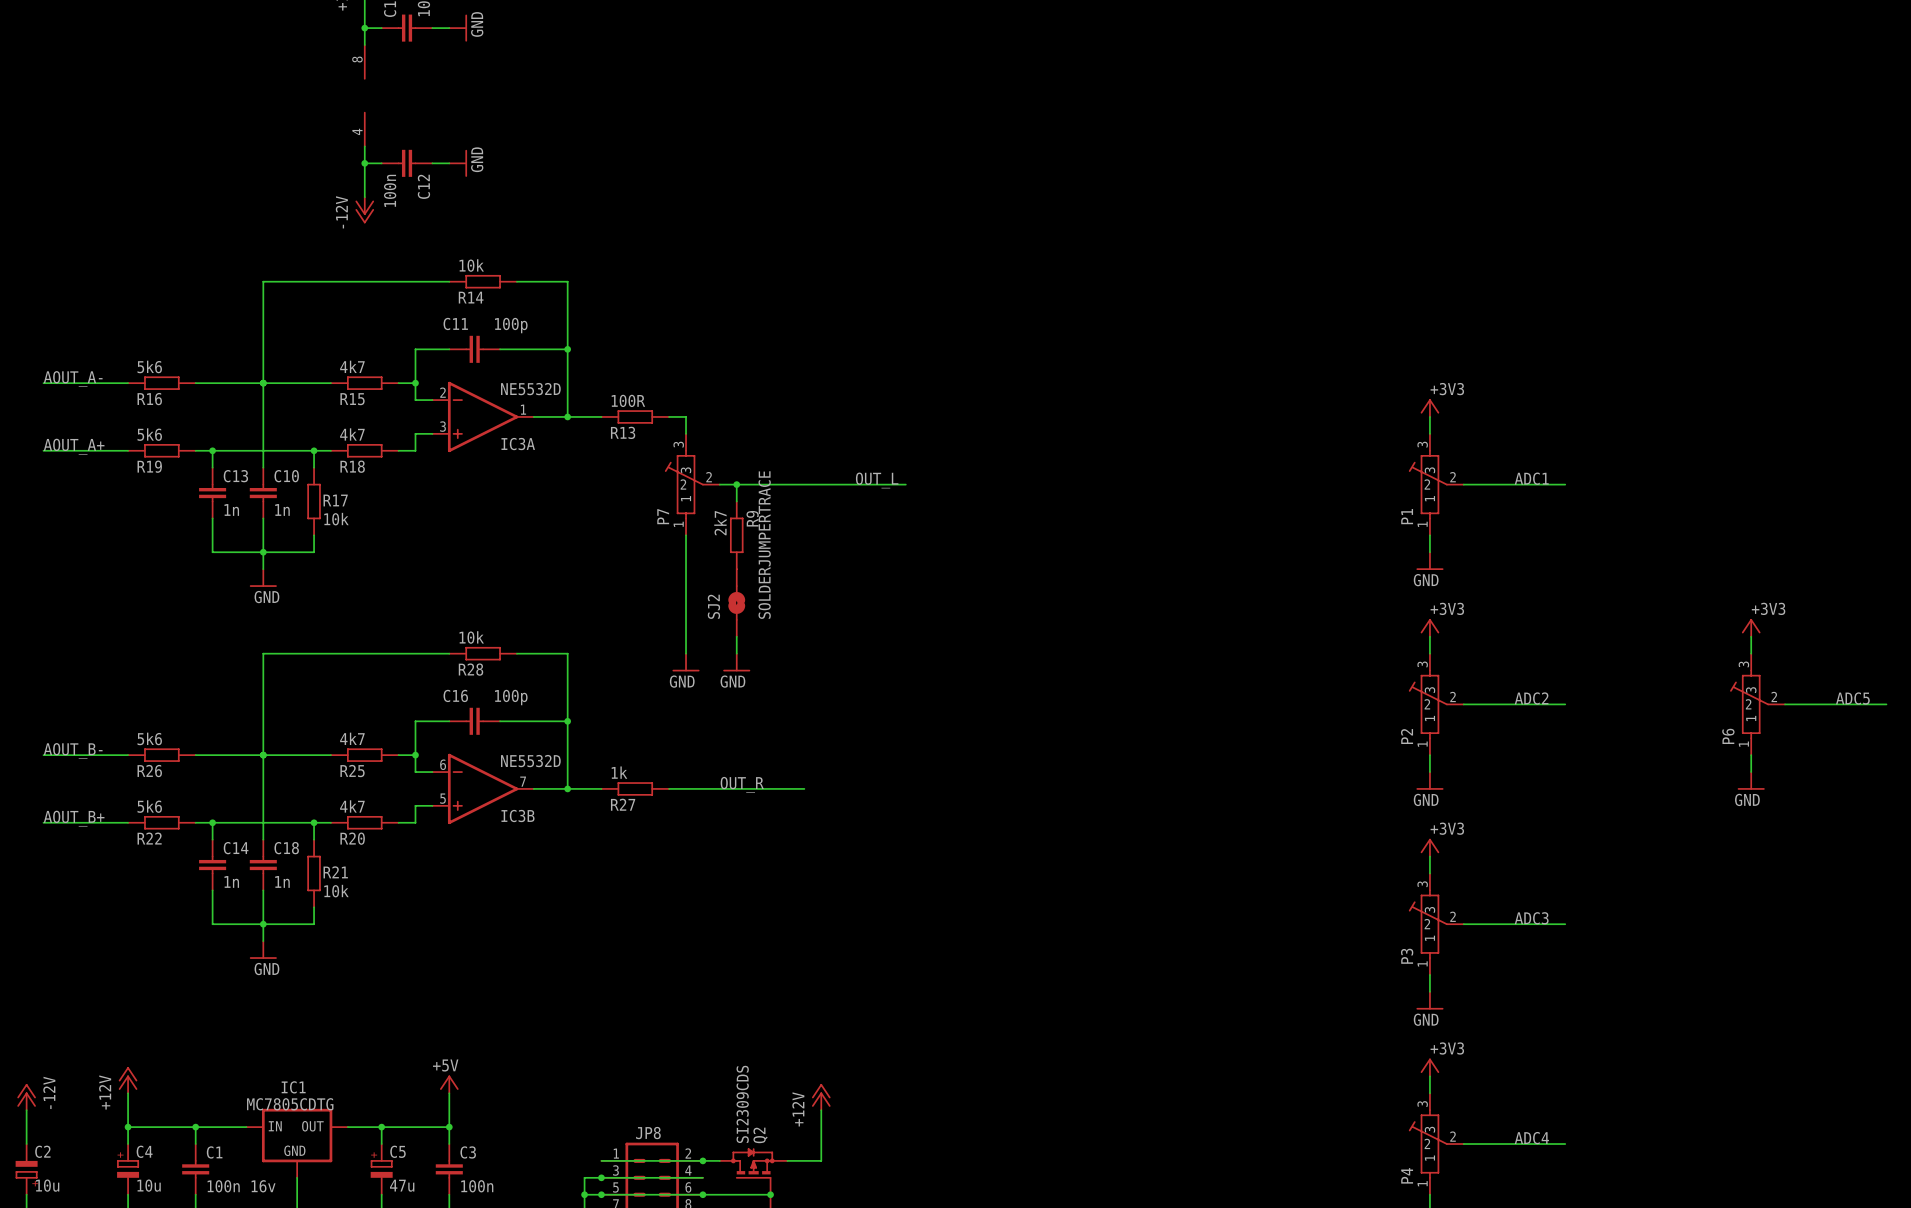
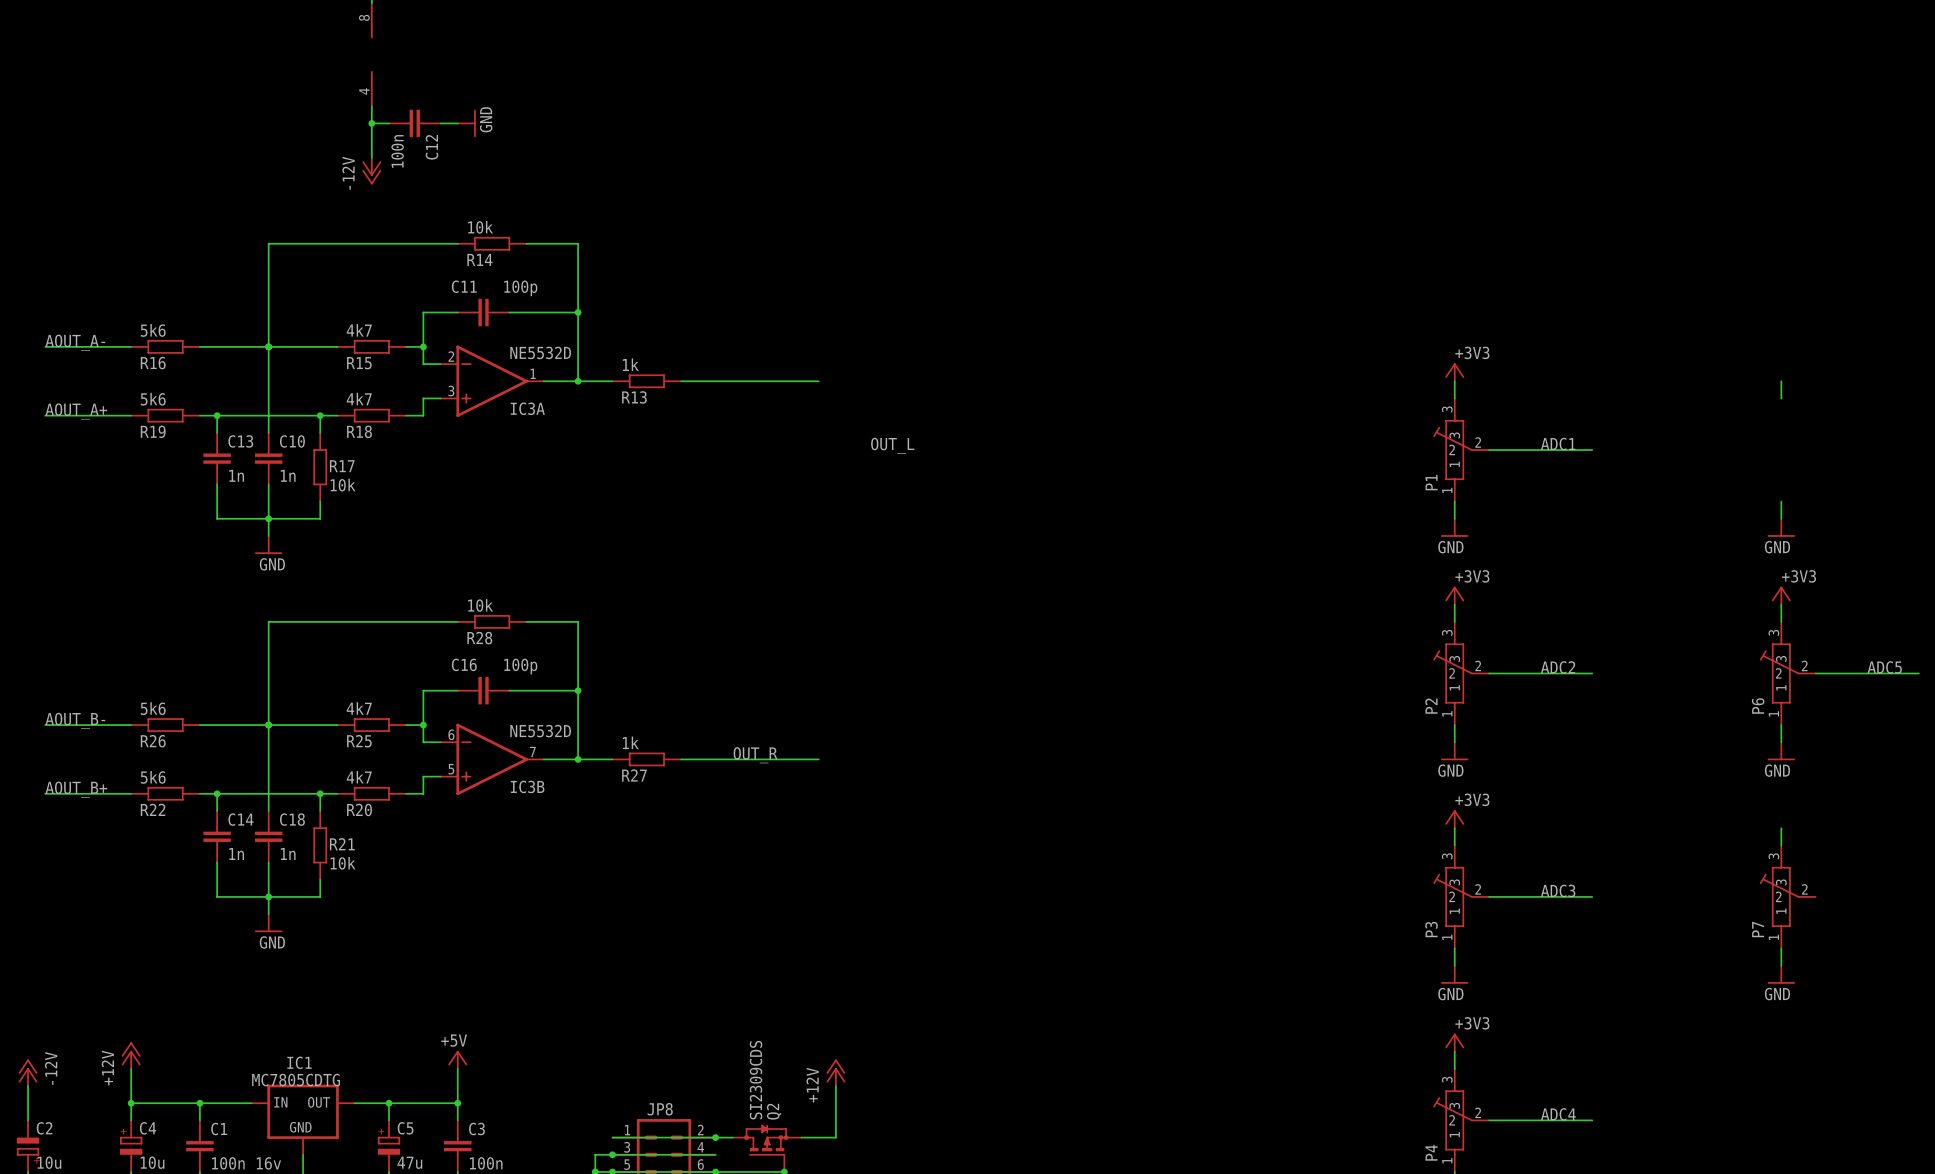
R13 value: 100R (628, 400) -> 1k (630, 364)
wire: (686, 416) (686, 433) -> (698, 381) (818, 381)
wire: none -> (1781, 381) (1781, 398)
P7 position: (692, 484) -> (1787, 896)
wire: (719, 484) (905, 484) -> none
wire: (736, 484) (736, 501) -> none
junction: (736, 484) -> none
wire: (686, 535) (686, 653) -> none
R9: 2k7 (736, 535) -> none
wire: none -> (1781, 501) (1781, 518)
power symbol: none -> GND (1781, 527)
SJ2: SOLDERJUMPERTRACE (736, 602) -> none
wire: (736, 636) (736, 653) -> none
power symbol: GND (686, 662) -> none
power symbol: GND (736, 662) -> none
wire: none -> (1781, 828) (1781, 845)
wire: none -> (1781, 948) (1781, 965)
power symbol: none -> GND (1781, 974)

